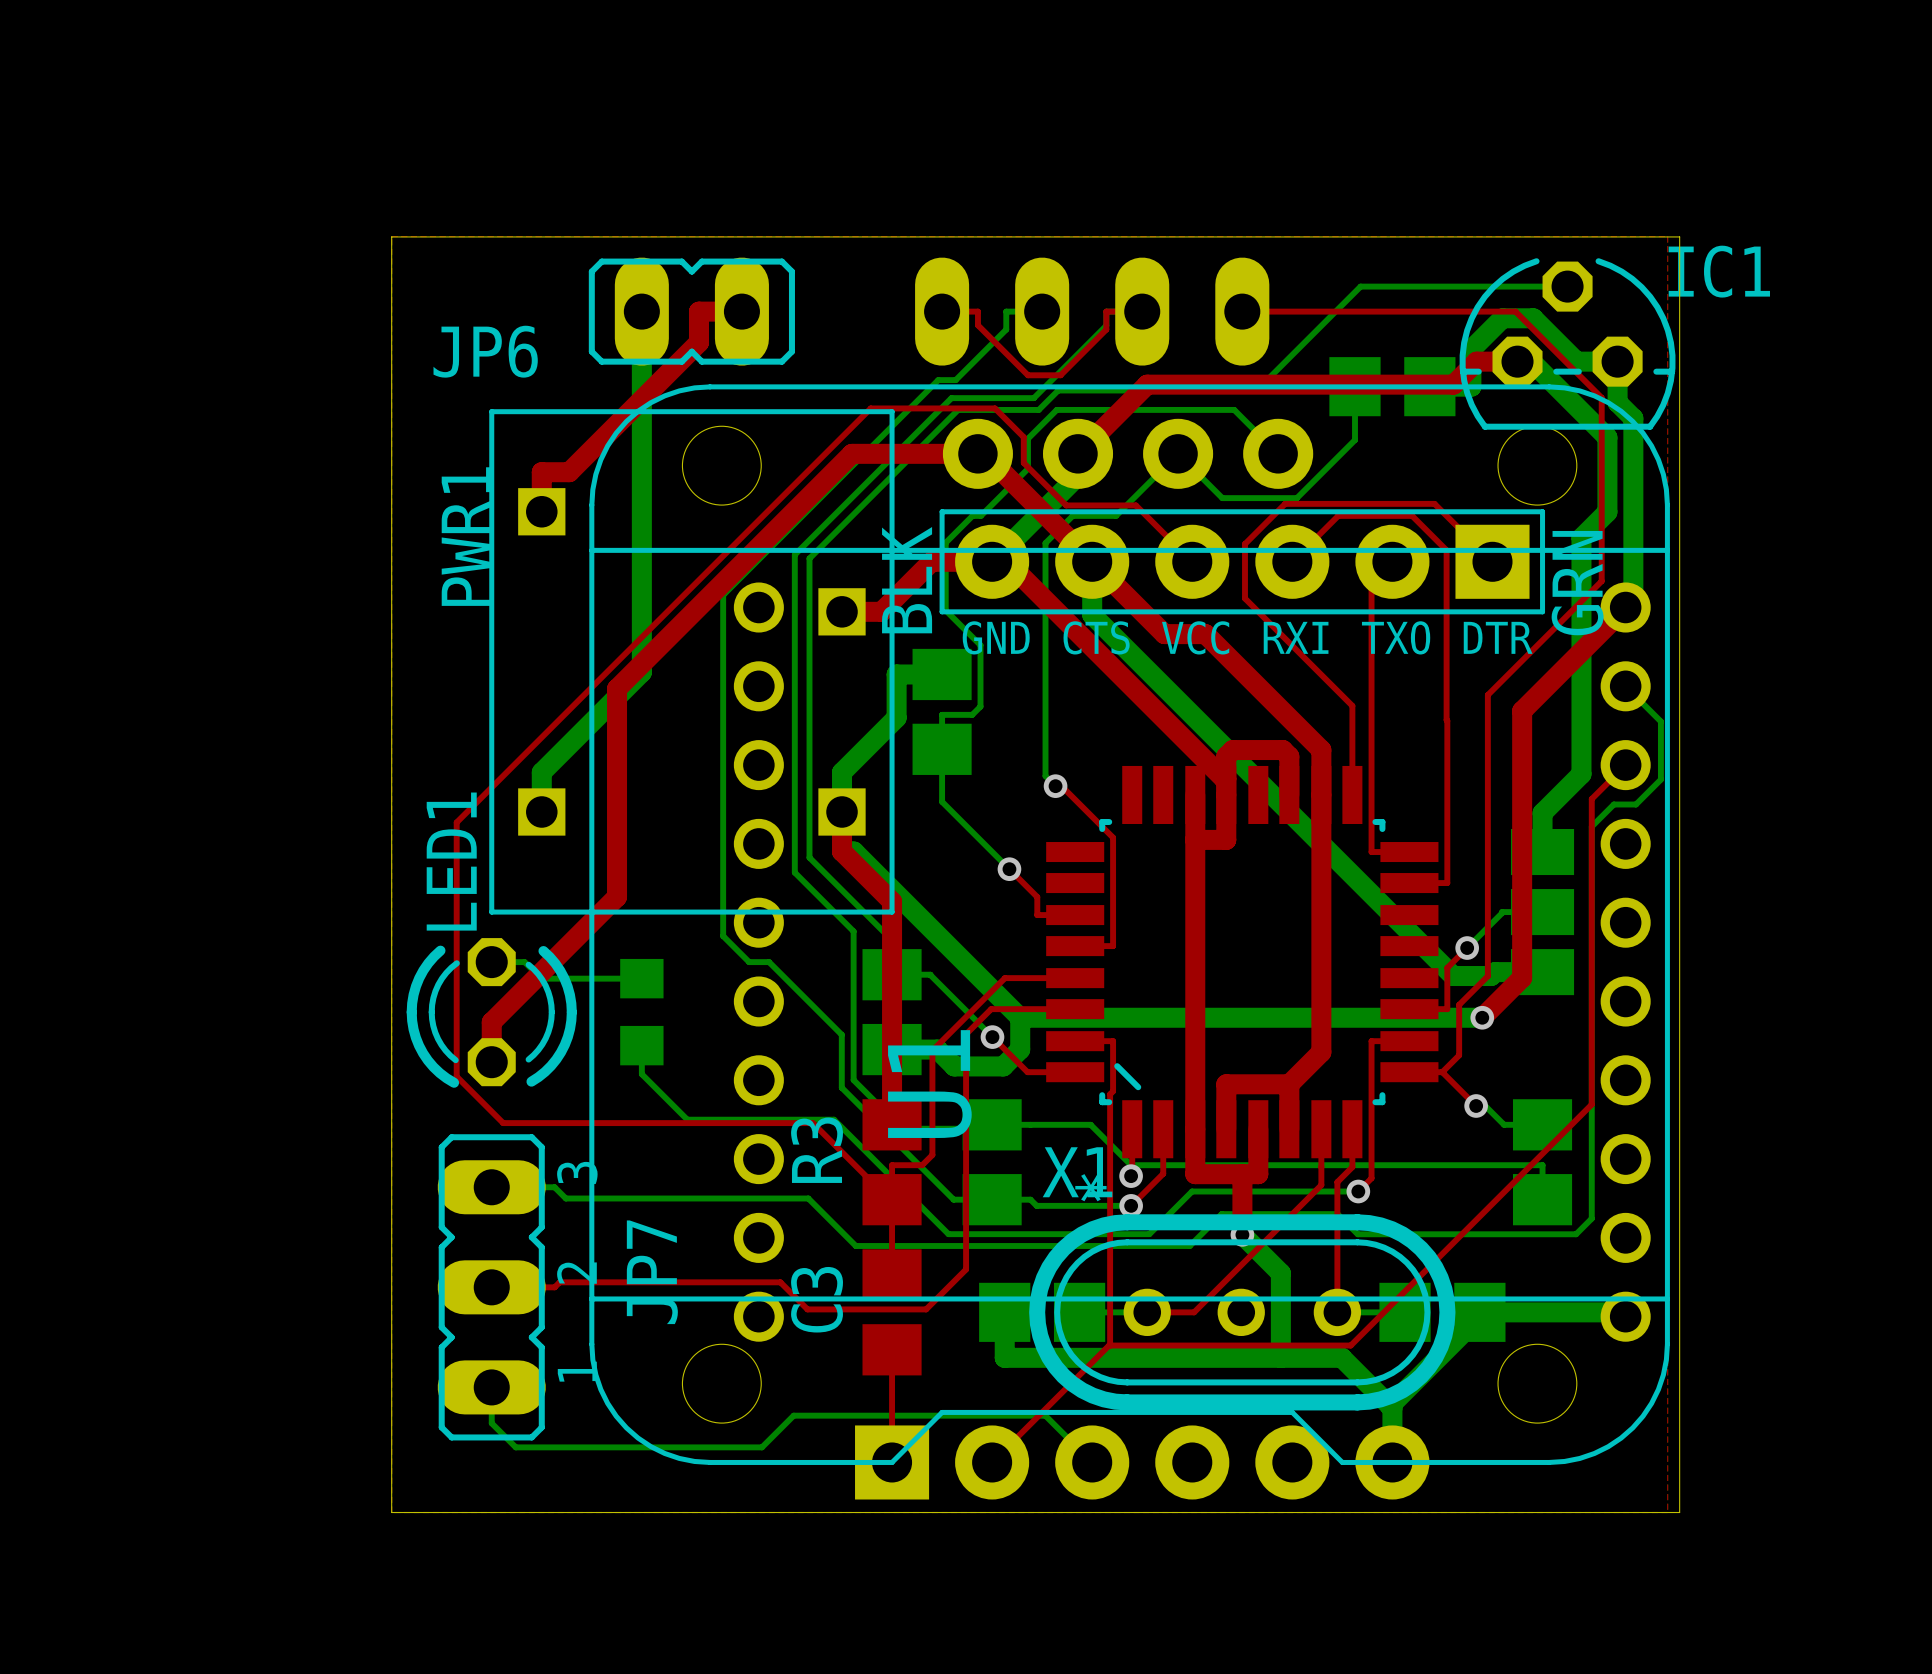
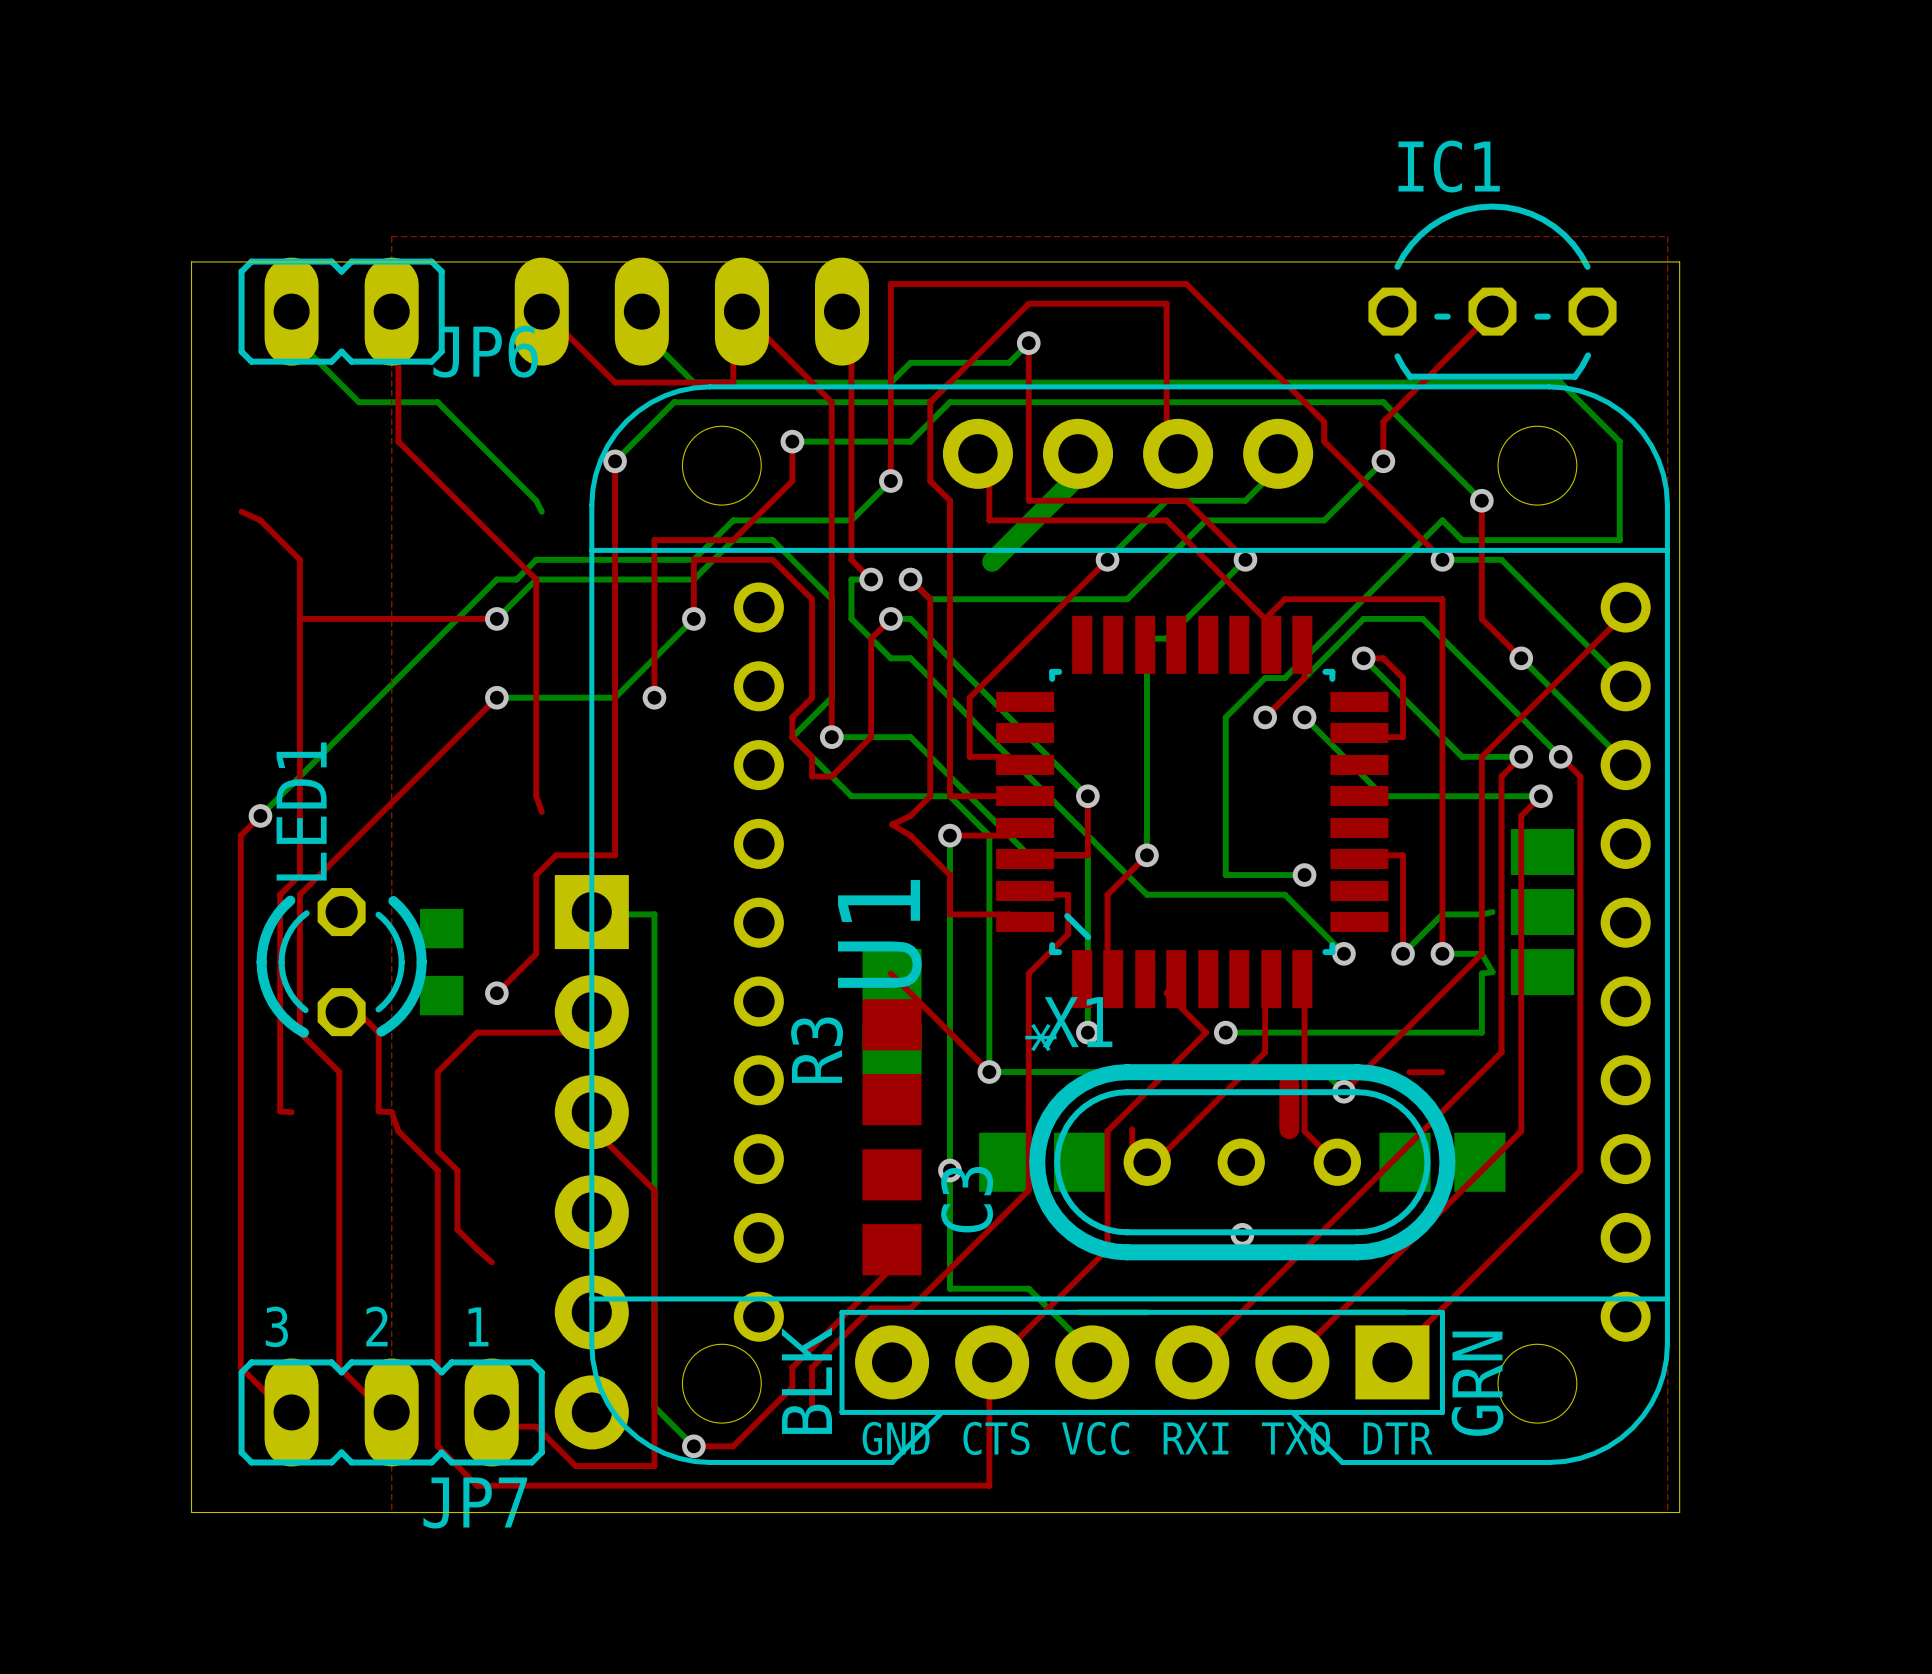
IC1 footprint: [1459, 258, 1676, 430] -> [1368, 203, 1617, 380]
board edge: (1679, 261) (1679, 236) (391, 236) (391, 1512) -> (1679, 261) (191, 261) (191, 1512) (391, 1512)
IC1 name position: IC1 (1719, 271) -> IC1 (1449, 166)
bottom track: (1567, 286) (1360, 286) (1256, 390) (1058, 390) (1038, 409) (958, 409) (809, 558) (809, 857) (892, 940) (892, 974) (930, 974) -> none
bottom track: none -> (291, 311) (280, 323) (358, 402) (437, 402) (536, 500) (541, 511)
top track: none -> (391, 311) (398, 323) (398, 441) (536, 579) (536, 796) (541, 811)
top track: none -> (541, 311) (615, 382) (733, 382) (733, 323) (741, 311) (831, 402) (831, 737)
part: none -> (591, 311)
bottom track: (641, 311) (641, 672) (541, 772) (541, 811) -> (641, 311) (634, 323) (693, 382) (890, 382) (910, 362) (1009, 362) (1028, 343)
JP6 position: (691, 311) -> (341, 311)
top track: (741, 311) (698, 311) (698, 342) (569, 472) (541, 472) (541, 511) -> none
part: none -> (791, 311)
top track: none -> (842, 311) (851, 323) (851, 559) (871, 579)
top track: (942, 311) (977, 311) (977, 325) (1027, 375) (1060, 375) (1106, 329) (1106, 311) (1142, 311) -> none
part: (992, 311) -> none
bottom track: (1042, 311) (1006, 311) (1006, 329) (955, 380) (938, 380) (723, 595) (723, 936) (749, 962) (769, 962) (841, 1034) (841, 1087) (953, 1199) (1030, 1199) (1036, 1205) (1131, 1205) -> none
bottom track: (1142, 311) (1106, 311) (1106, 325) (1033, 398) (951, 398) (794, 554) (794, 872) (853, 931) (853, 1080) (902, 1128) (992, 1128) (992, 1124) (1090, 1124) (1131, 1165) -> none
part: (1192, 311) -> none
top track: (1242, 311) (1515, 311) (1601, 397) (1601, 581) (1487, 695) (1487, 976) (1459, 1004) (1459, 1055) (1442, 1072) (1476, 1105) -> none
top track: none -> (1492, 311) (1383, 421) (1383, 461)
top track: none -> (1028, 343) (1028, 500) (1186, 500) (1245, 559)
via: none -> (1028, 343)
bottom track: (1517, 361) (1531, 361) (1607, 437) (1607, 512) (1581, 538) (1581, 774) (1542, 813) (1542, 852) -> none
top track: (1517, 361) (1476, 361) (1453, 384) (1147, 384) (1078, 453) -> none
bottom track: (1354, 386) (1354, 440) (1296, 498) (1222, 498) (1178, 453) (1116, 515) (1072, 515) (1045, 543) (1045, 776) (1055, 786) -> none
part: (1392, 386) -> none
bottom track: (1429, 386) (1471, 386) (1471, 349) (1502, 318) (1533, 318) (1576, 361) (1617, 361) (1617, 402) (1633, 418) (1633, 599) (1625, 607) -> none
bottom track: none -> (792, 441) (910, 441) (949, 402) (1383, 402) (1481, 500)
top track: none -> (792, 441) (792, 481) (733, 540) (654, 540) (654, 697)
via: none -> (792, 441)
top track: none -> (977, 453) (989, 461) (989, 520) (1166, 520) (1265, 618)
top track: none -> (1178, 453) (1166, 441) (1166, 303) (1028, 303) (930, 402) (930, 481) (949, 500) (949, 796) (1025, 795)
bottom track: (1278, 453) (1234, 409) (1056, 409) (1027, 438) (1027, 468) (980, 515) (972, 515) (945, 542) (945, 610) (980, 645) (980, 706) (972, 714) (942, 714) (942, 801) (1009, 869) -> (1278, 453) (1284, 461) (1245, 500) (1166, 500) (1107, 559)
bottom track: none -> (615, 461) (674, 402) (930, 402) (949, 382) (1560, 382) (1619, 441) (1619, 540) (1462, 540) (1442, 520) (1284, 678) (1265, 678) (1225, 717) (1225, 875) (1304, 875)
top track: none -> (615, 461) (615, 855) (555, 855) (536, 875) (536, 953) (496, 993)
via: none -> (615, 461)
bottom track: none -> (1383, 461) (1324, 520) (1206, 520) (1127, 599) (930, 599) (910, 579)
via: none -> (1383, 461)
bottom track: none -> (890, 481) (851, 520) (733, 520) (693, 559) (536, 559) (516, 579) (496, 579) (260, 815)
top track: none -> (890, 481) (890, 284) (1186, 284) (1324, 421) (1324, 441) (1442, 559)
via: none -> (890, 481)
top track: none -> (1481, 500) (1481, 618) (1521, 658)
via: none -> (1481, 500)
top track: none -> (241, 511) (260, 520) (299, 559) (299, 875) (280, 894) (280, 1111) (291, 1112)
top track: none -> (1107, 559) (969, 697) (969, 756) (1009, 756) (1025, 764)
via: none -> (1107, 559)
bottom track: none -> (1245, 559) (1166, 638) (1146, 638) (1146, 855)
via: none -> (1245, 559)
via: none -> (1442, 559)
bottom track: (1092, 561) (1092, 614) (1453, 976) (1491, 976) (1495, 972) (1542, 972) -> none
top track: (1192, 561) (1135, 505) (1066, 505) (1023, 463) (1023, 437) (995, 408) (870, 408) (456, 822) (456, 1076) (503, 1123) (812, 1123) (872, 1182) (892, 1182) -> none
part position: (1242, 561) -> (1142, 1362)
top track: (1292, 561) (1338, 515) (1412, 515) (1446, 550) (1447, 883) (1409, 883) -> none
top track: (1392, 561) (1371, 582) (1371, 852) (1409, 852) -> none
top track: (1492, 561) (1434, 503) (1285, 503) (1244, 544) (1244, 598) (1352, 705) (1352, 794) -> none
bottom track: none -> (871, 579) (851, 579) (851, 618) (890, 658) (910, 658) (1146, 894) (1284, 894) (1343, 953)
via: none -> (871, 579)
top track: none -> (910, 579) (930, 599) (930, 796) (910, 815) (892, 824) (910, 835) (949, 875) (949, 914) (1009, 914) (1025, 922)
via: none -> (910, 579)
top track: (1625, 607) (1522, 711) (1522, 977) (1482, 1017) -> (1625, 607) (1619, 618) (1481, 756) (1481, 953) (1343, 1091)
top track: (842, 611) (881, 611) (931, 561) (1006, 561) (1224, 778) (1226, 778) -> none
top track: none -> (299, 618) (496, 618)
bottom track: none -> (496, 618) (536, 579) (693, 579) (733, 540) (772, 540) (831, 599) (831, 697) (792, 737) (851, 796) (949, 796) (989, 835) (989, 1072) (1324, 1072) (1343, 1091)
via: none -> (496, 618)
bottom track: none -> (693, 618) (615, 697) (496, 697)
top track: none -> (693, 618) (693, 559) (772, 559) (812, 599) (812, 697) (792, 717) (792, 737) (812, 756) (812, 776) (831, 776) (871, 737) (871, 638) (890, 618)
via: none -> (693, 618)
bottom track: none -> (890, 618) (910, 618) (1087, 796)
via: none -> (890, 618)
top track: none -> (1265, 618) (1284, 599) (1442, 599) (1442, 953)
top track: none -> (1302, 644) (1304, 678) (1265, 717)
bottom track: none -> (1363, 658) (1462, 756) (1521, 756)
top track: none -> (1363, 658) (1383, 658) (1403, 678) (1403, 737) (1363, 737) (1359, 732)
via: none -> (1363, 658)
bottom track: none -> (1521, 658) (1619, 756) (1625, 765)
via: none -> (1521, 658)
PWR1: (691, 661) -> none
bottom track: (942, 674) (896, 674) (896, 717) (842, 772) (842, 851) (854, 851) (1020, 1017) -> none
bottom track: (1625, 686) (1660, 721) (1660, 779) (1635, 804) (1613, 804) (1591, 826) (1591, 1218) (1576, 1234) (1357, 1234) (1337, 1214) (1221, 1214) (1189, 1245) (855, 1245) (808, 1198) (565, 1198) (554, 1187) (491, 1187) -> (1625, 686) (1619, 678) (1501, 559) (1442, 559)
top track: none -> (496, 697) (299, 894) (299, 1032) (339, 1072) (339, 1367) (378, 1406) (391, 1412)
via: none -> (496, 697)
via: none -> (654, 697)
part: (942, 711) -> none
bottom track: none -> (1265, 717) (1363, 618) (1422, 618) (1560, 756)
via: none -> (1265, 717)
bottom track: none -> (1304, 717) (1383, 796) (1540, 796)
via: none -> (1304, 717)
bottom track: none -> (831, 737) (910, 737) (1028, 855) (1087, 855) (1087, 1032)
via: none -> (831, 737)
top track: none -> (1521, 756) (1501, 776) (1501, 1052) (1192, 1362)
via: none -> (1521, 756)
top track: none -> (1560, 756) (1580, 776) (1580, 1170) (1403, 1347) (1392, 1362)
via: none -> (1560, 756)
top track: (1625, 765) (1591, 798) (1591, 1104) (1350, 1345) (1109, 1345) (992, 1462) -> none
top track: (1055, 786) (1061, 786) (1113, 837) (1113, 946) (1075, 946) -> none
via position: (1055, 786) -> (1087, 796)
top track: (1195, 794) (1195, 1174) (1258, 1174) (1258, 1129) -> none
top track: (1289, 794) (1289, 756) (1282, 750) (1232, 750) (1226, 756) (1226, 839) (1195, 839) -> none
top track: none -> (1087, 796) (1087, 855) (1028, 855) (1025, 859)
top track: none -> (1540, 796) (1521, 815) (1521, 1131) (1304, 1347) (1292, 1362)
via: none -> (1540, 796)
top track: (842, 811) (842, 851) (892, 901) (892, 1124) -> none
top track: none -> (260, 815) (240, 835) (240, 1367) (280, 1406) (291, 1412)
via: none -> (260, 815)
top track: none -> (1025, 828) (1009, 835) (949, 835)
bottom track: none -> (949, 835) (949, 1288) (1028, 1288) (1087, 1347) (1092, 1362)
via: none -> (949, 835)
top track: none -> (1146, 855) (1107, 894) (1107, 973) (1113, 979)
via: none -> (1146, 855)
top track: none -> (1359, 859) (1363, 855) (1403, 855) (1403, 953)
top track: (1009, 869) (1037, 897) (1037, 915) (1075, 915) -> none
via: (1009, 869) -> none
via: none -> (1304, 875)
top track: none -> (1025, 891) (1028, 894) (1068, 894) (1068, 934) (1028, 973) (1028, 1190) (910, 1308) (871, 1308) (812, 1367) (812, 1406)
bottom track: none -> (591, 912) (595, 914) (654, 914) (654, 1406) (693, 1446)
bottom track: none -> (1492, 912) (1481, 914) (1442, 914) (1403, 953)
bottom track: (1542, 912) (1502, 912) (1467, 948) -> none
top track: (1467, 948) (1447, 967) (1447, 1009) (1409, 1009) -> none
via position: (1467, 948) -> (1442, 953)
via: none -> (1343, 953)
via: none -> (1403, 953)
bottom track: none -> (1442, 953) (1481, 953) (1492, 972) (1481, 973) (1481, 1032) (1225, 1032)
bottom track: (491, 962) (524, 962) (541, 978) (641, 978) -> none
U1 position: (1242, 962) -> (1192, 811)
top track: none -> (890, 973) (989, 1072)
bottom track: (930, 975) (992, 1037) -> none
top track: (1075, 978) (1004, 978) (932, 1050) (932, 1154) (922, 1165) (892, 1165) (892, 1274) -> none
top track: none -> (1176, 979) (1166, 993) (1206, 1032) (1107, 1131) (1107, 1249) (992, 1362) (989, 1367) (989, 1485) (477, 1485) (437, 1446) (437, 1170) (398, 1131) (391, 1112) (378, 1111) (378, 1032) (358, 1012) (341, 1012)
top track: none -> (1271, 979) (1265, 993) (1265, 1052) (1166, 1150) (1147, 1162)
top track: none -> (1302, 979) (1304, 993) (1304, 1131) (1337, 1162)
via: none -> (496, 993)
top track: (1075, 1009) (991, 1009) (966, 1034) (966, 1269) (926, 1309) (807, 1309) (780, 1282) (559, 1282) (554, 1287) (491, 1287) -> none
LED1 position: (491, 1012) -> (341, 962)
top track: none -> (591, 1012) (575, 1012) (575, 1032) (477, 1032) (437, 1072) (437, 1150) (457, 1170) (457, 1229) (491, 1262)
part position: (641, 1012) -> (441, 962)
bottom track: (1020, 1017) (1482, 1017) -> none
bottom track: (1020, 1017) (1020, 1049) (1003, 1066) (954, 1066) (937, 1049) (892, 1049) -> none
via: (1482, 1017) -> none
via: none -> (1087, 1032)
via: none -> (1225, 1032)
top track: (992, 1037) (1027, 1072) (1075, 1072) -> none
via position: (992, 1037) -> (989, 1072)
top track: (1075, 1041) (1113, 1041) (1113, 1091) (1110, 1094) (1110, 1345) -> none
top track: (1409, 1041) (1371, 1041) (1371, 1178) (1358, 1191) -> none
bottom track: (641, 1045) (641, 1074) (687, 1119) (834, 1119) (948, 1234) (1149, 1234) (1192, 1191) (1358, 1191) -> none
top track: (491, 1062) (491, 1022) (617, 896) (617, 688) (852, 453) (984, 453) (1164, 634) (1205, 634) (1321, 750) (1321, 1052) (1289, 1084) (1226, 1084) (1226, 1129) -> none
via: none -> (1343, 1091)
bottom track: (1476, 1105) (1485, 1105) (1504, 1124) (1542, 1124) -> none
via: (1476, 1105) -> none
top track: none -> (591, 1112) (595, 1131) (654, 1190) (654, 1466) (575, 1466) (536, 1426) (496, 1426) (491, 1412)
top track: (1163, 1129) (1163, 1173) (1131, 1205) -> none
top track: (1321, 1129) (1321, 1185) (1194, 1312) (1147, 1312) -> none
top track: (1352, 1129) (1352, 1167) (1337, 1182) (1337, 1312) -> none
JP7 footprint: [437, 1134, 546, 1441] -> [238, 1358, 545, 1467]
R3 position: (892, 1162) -> (892, 1062)
part rotation: 0° (992, 1162) -> 90° clockwise (1042, 1162)
part: none -> (1442, 1162)
part: (1542, 1162) -> none
bottom track: (1131, 1165) (1542, 1165) (1542, 1199) -> none
via: none -> (949, 1170)
top track: (1242, 1174) (1242, 1234) -> none
via: (1131, 1176) -> none
via: (1358, 1191) -> none
via: (1131, 1205) -> none
bottom track: (1242, 1234) (1280, 1273) (1280, 1357) -> none
top track: none -> (892, 1249) (890, 1269) (792, 1367) (792, 1387) (733, 1446) (693, 1446)
JP7 name position: JP7 (652, 1272) -> JP7 (475, 1502)
C3 name position: C3 (817, 1299) -> C3 (967, 1199)
C3 position: (892, 1312) -> (892, 1212)
bottom track: (1004, 1312) (1004, 1357) (1341, 1357) (1392, 1408) (1392, 1462) -> none
part: (1042, 1312) -> none
X1 position: (1242, 1312) -> (1242, 1162)
part: (1442, 1312) -> none
bottom track: (1625, 1316) (1621, 1312) (1479, 1312) (1479, 1316) (1390, 1406) -> none
top track: (892, 1349) (892, 1462) -> none
bottom track: (491, 1387) (491, 1423) (515, 1447) (761, 1447) (793, 1415) (1045, 1415) (1092, 1462) -> none
via: none -> (693, 1446)
part rotation: 0° (1142, 1462) -> 90° clockwise (591, 1162)
part position: (1142, 1462) -> (591, 1162)

